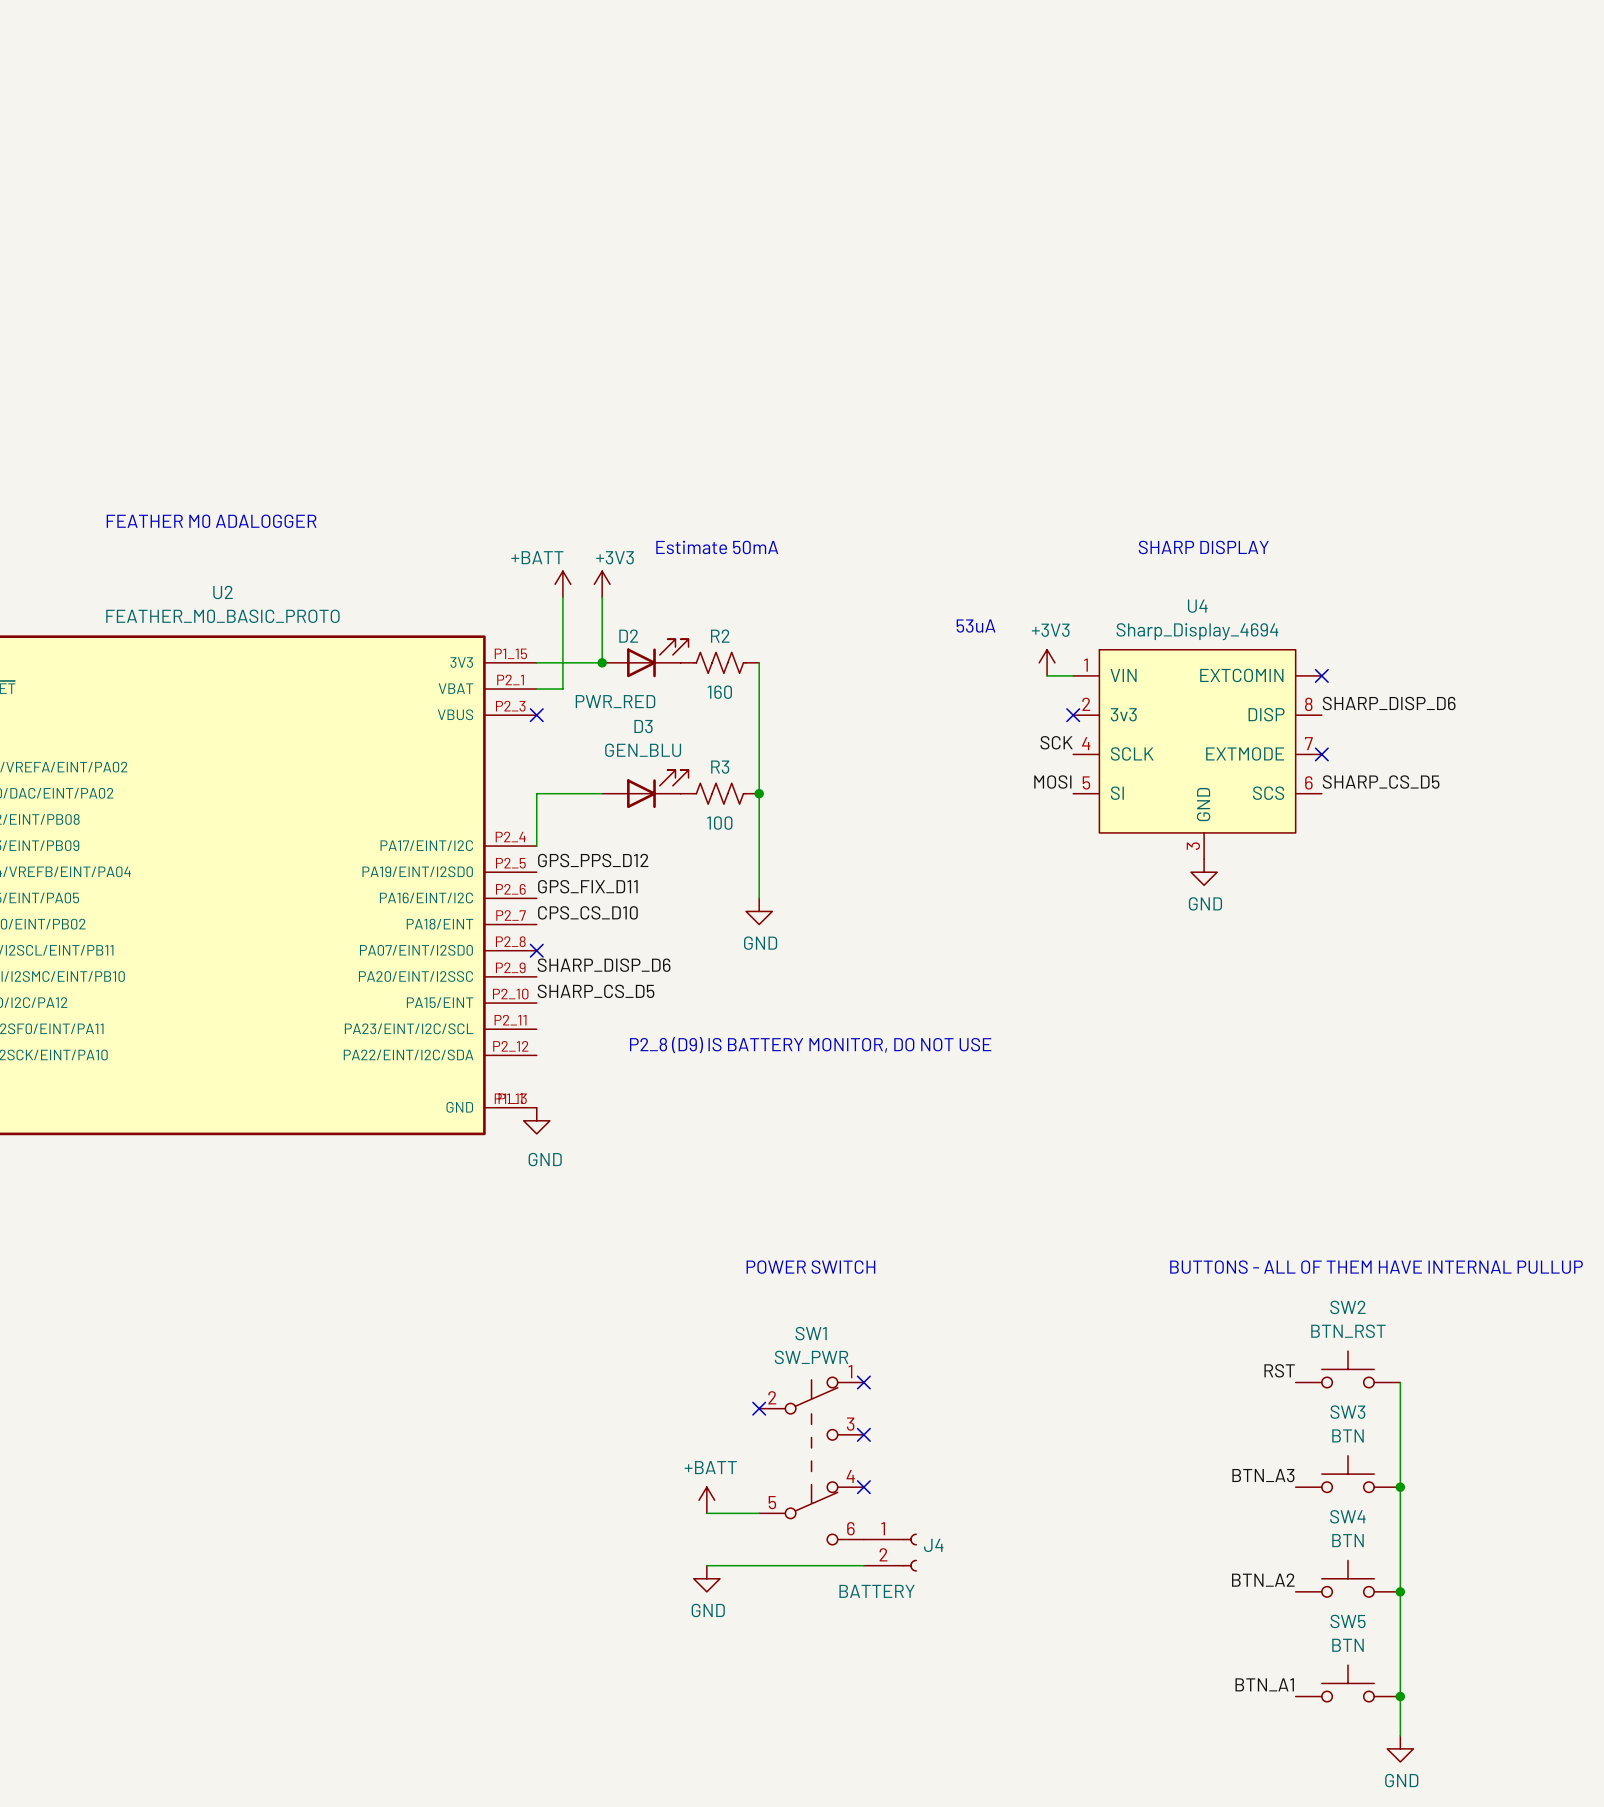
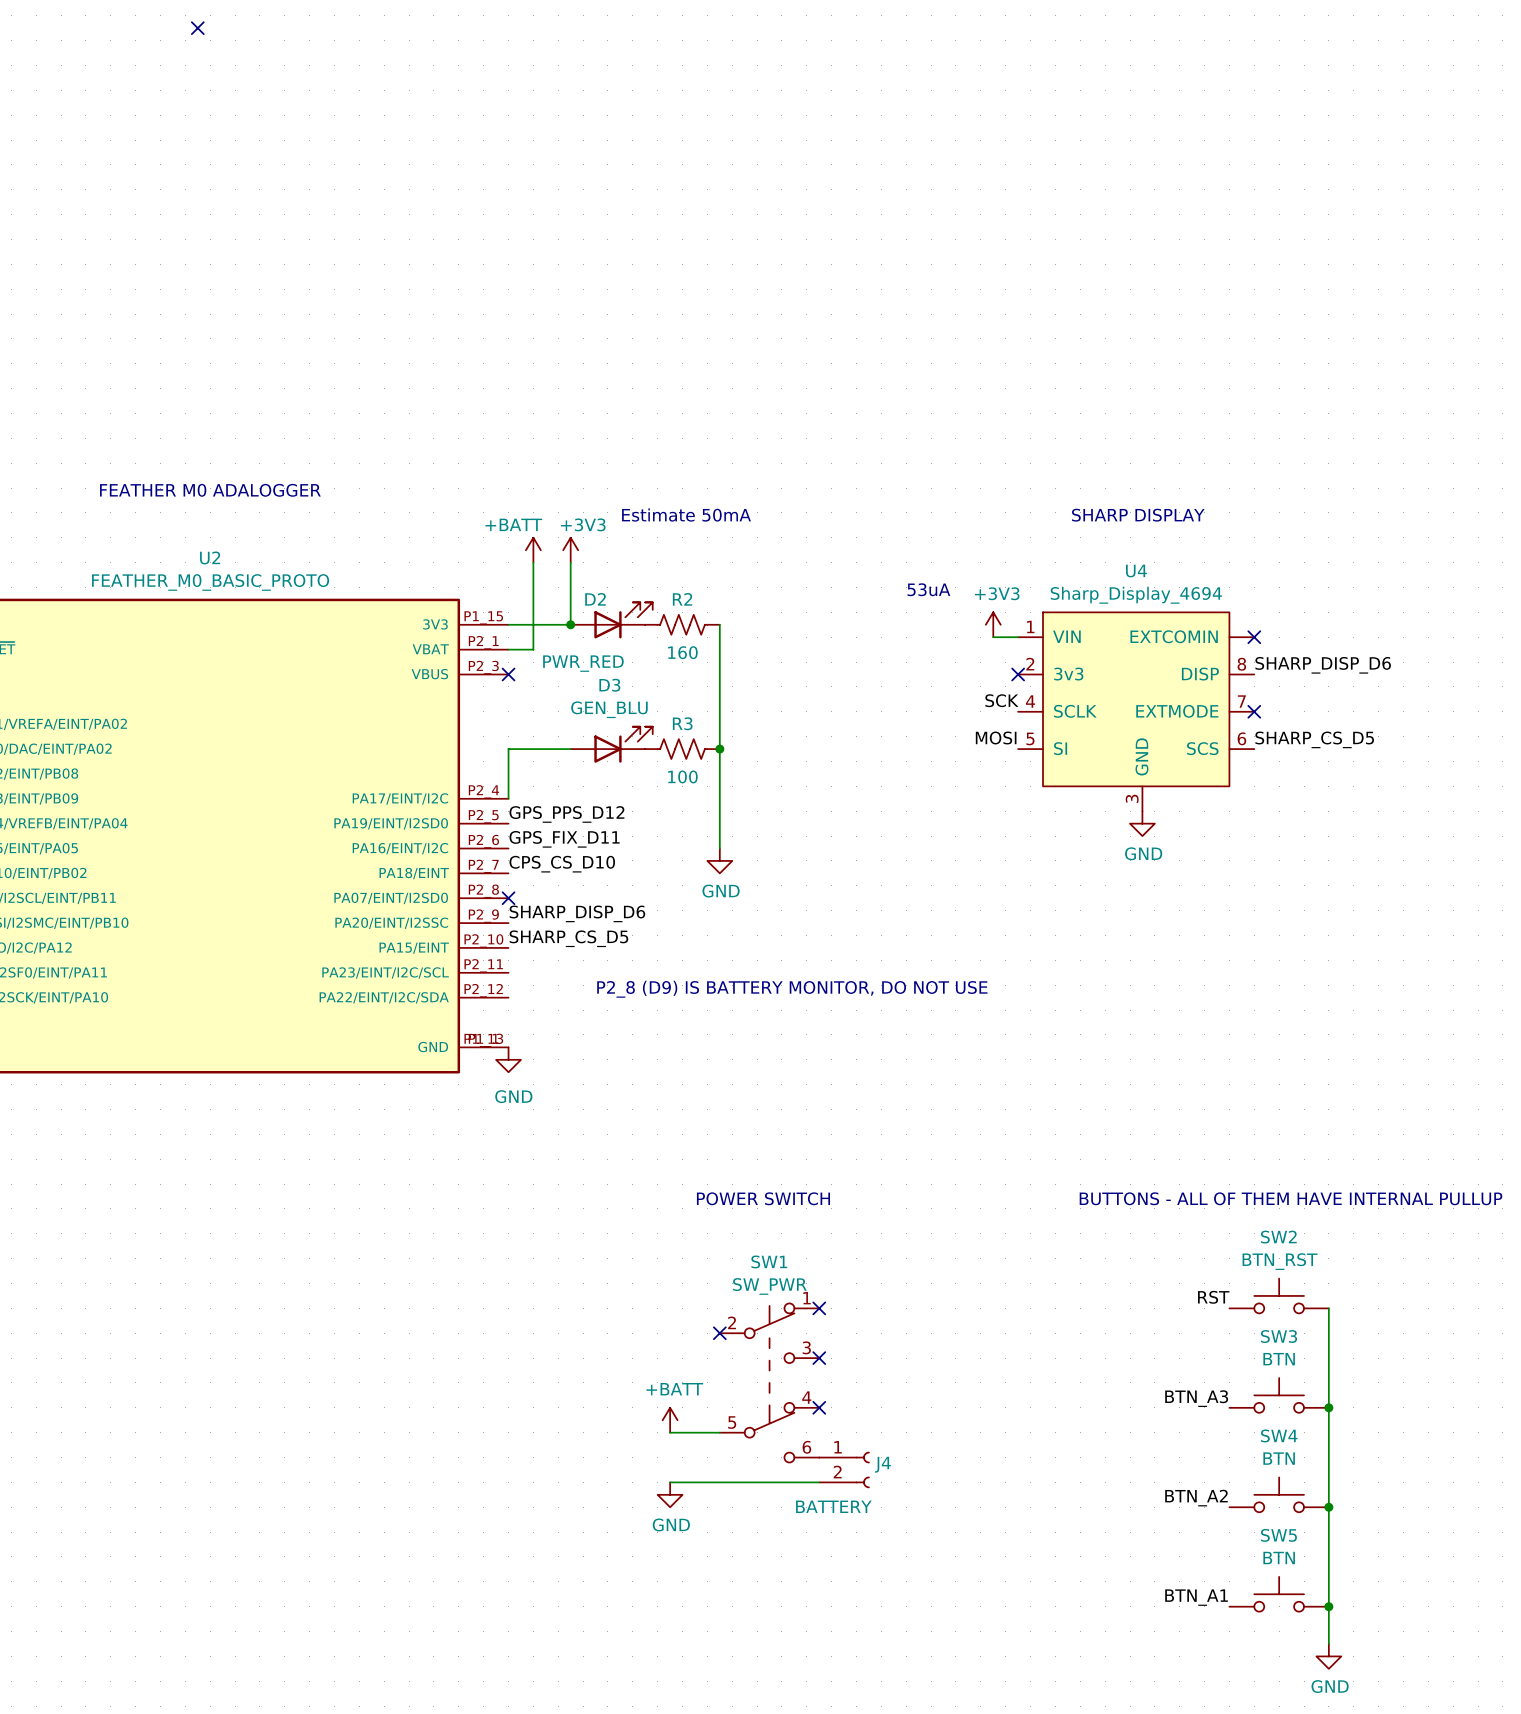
no-connect mark: none -> (197, 28)

